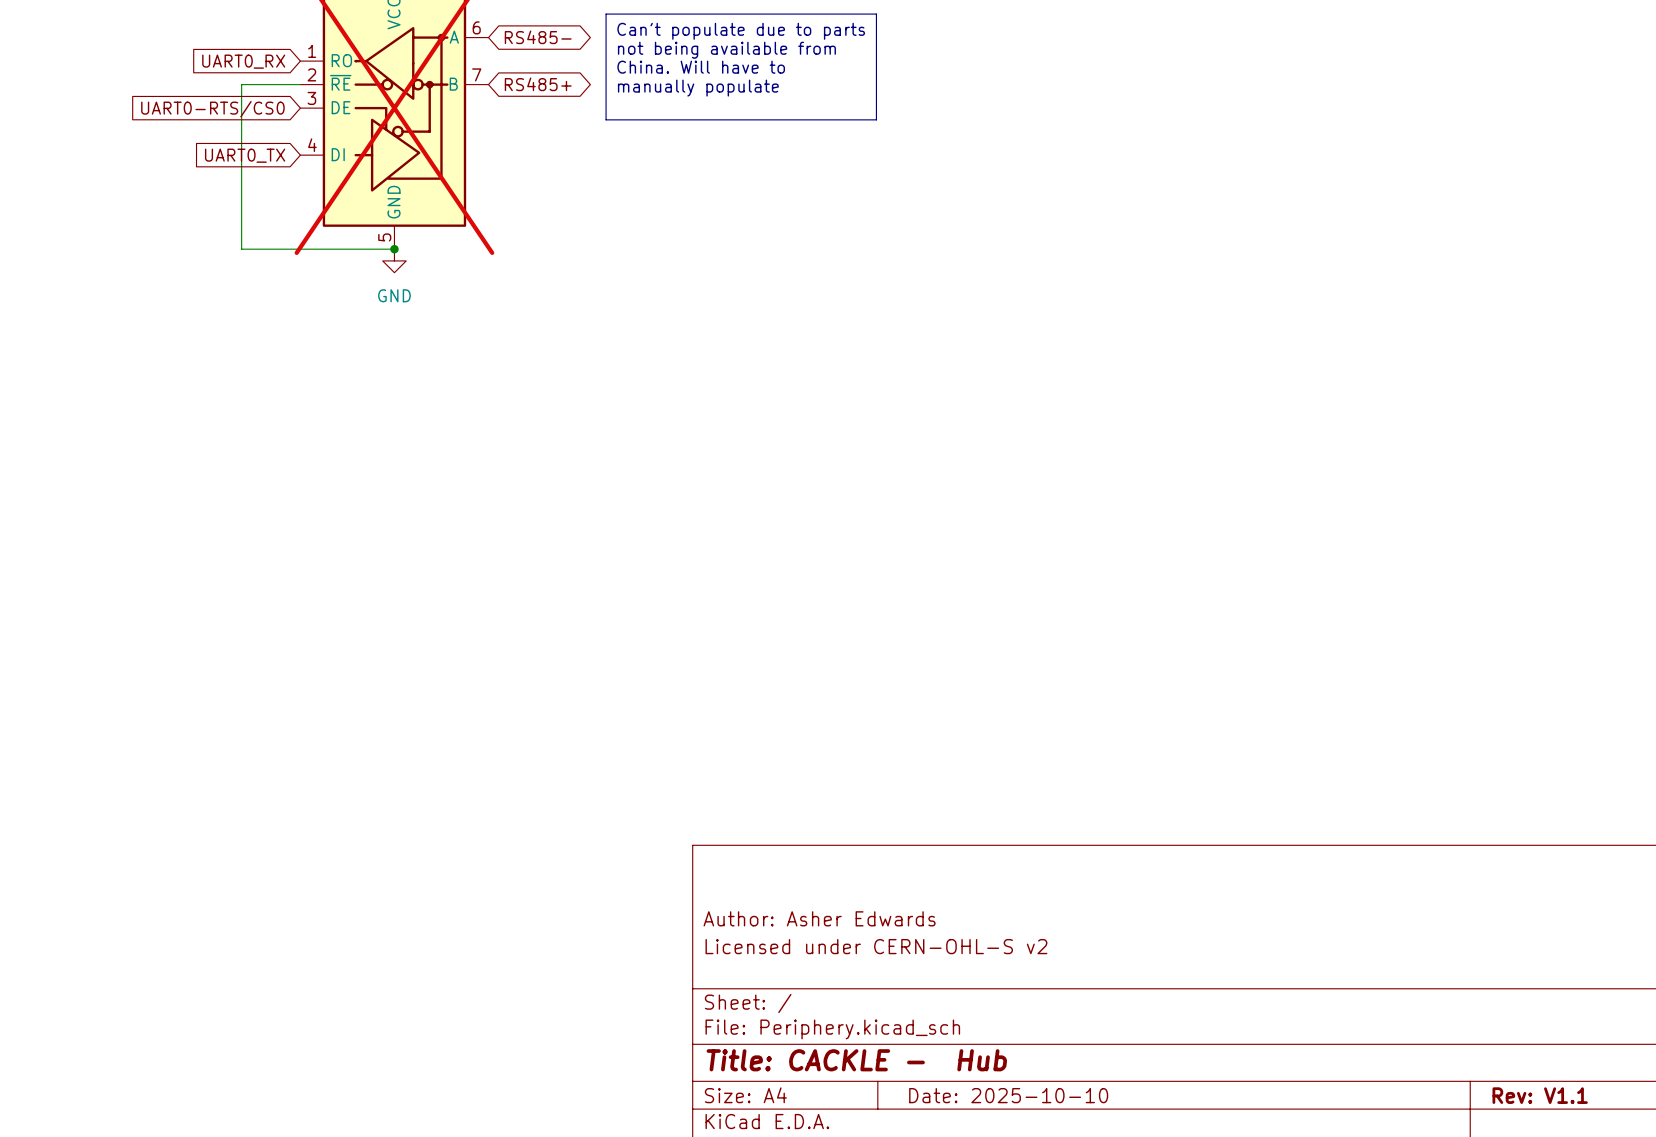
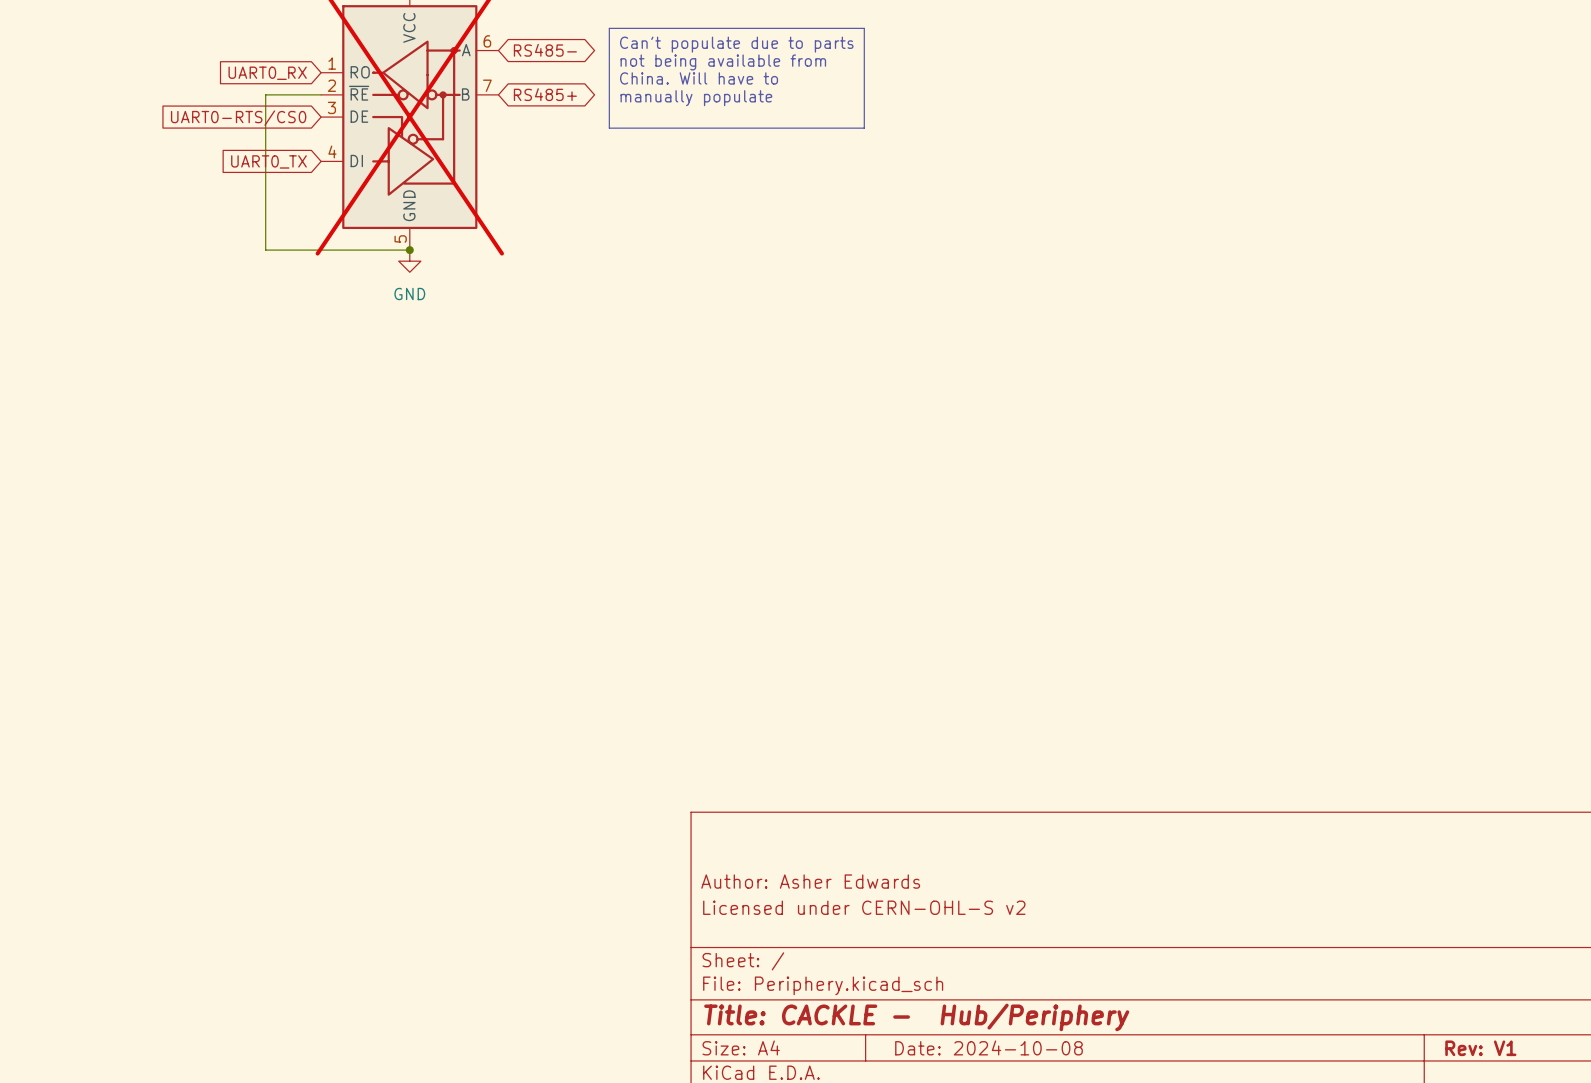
title block: Title: CACKLE - Hub (856, 1060) -> Title: CACKLE - Hub/Periphery (916, 1017)
title block: Date: 2025-10-10 (1008, 1095) -> Date: 2024-10-08 (989, 1047)
title block: Rev: V1.1 (1540, 1095) -> Rev: V1 (1480, 1048)

